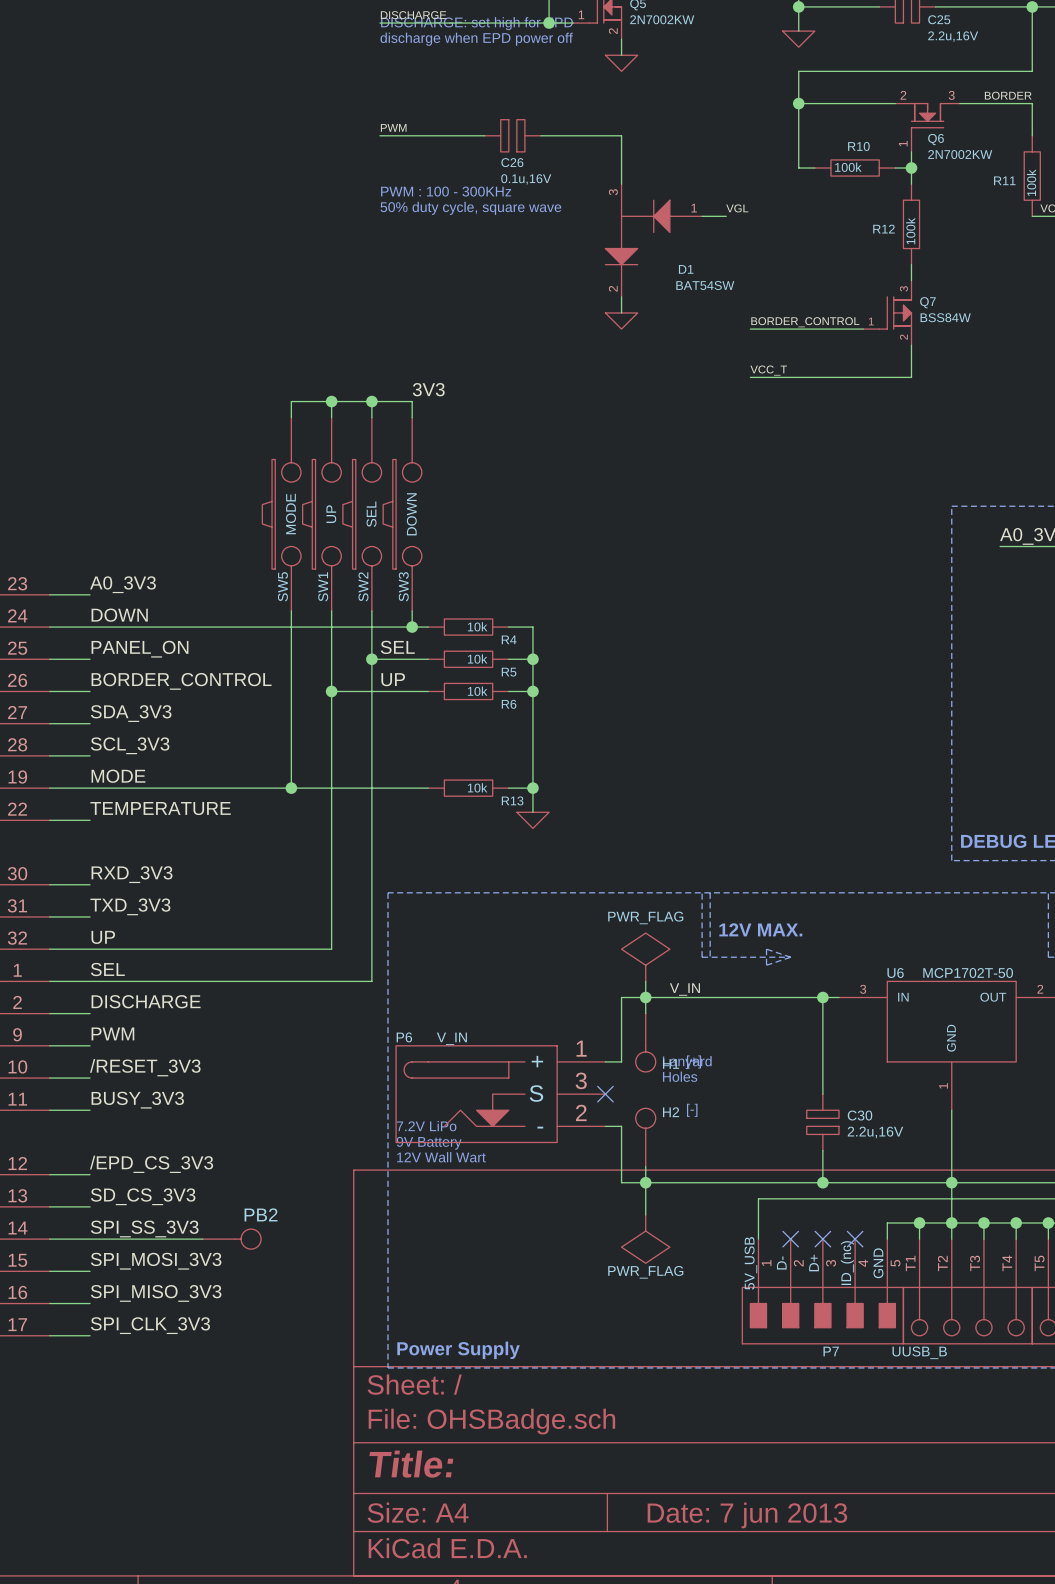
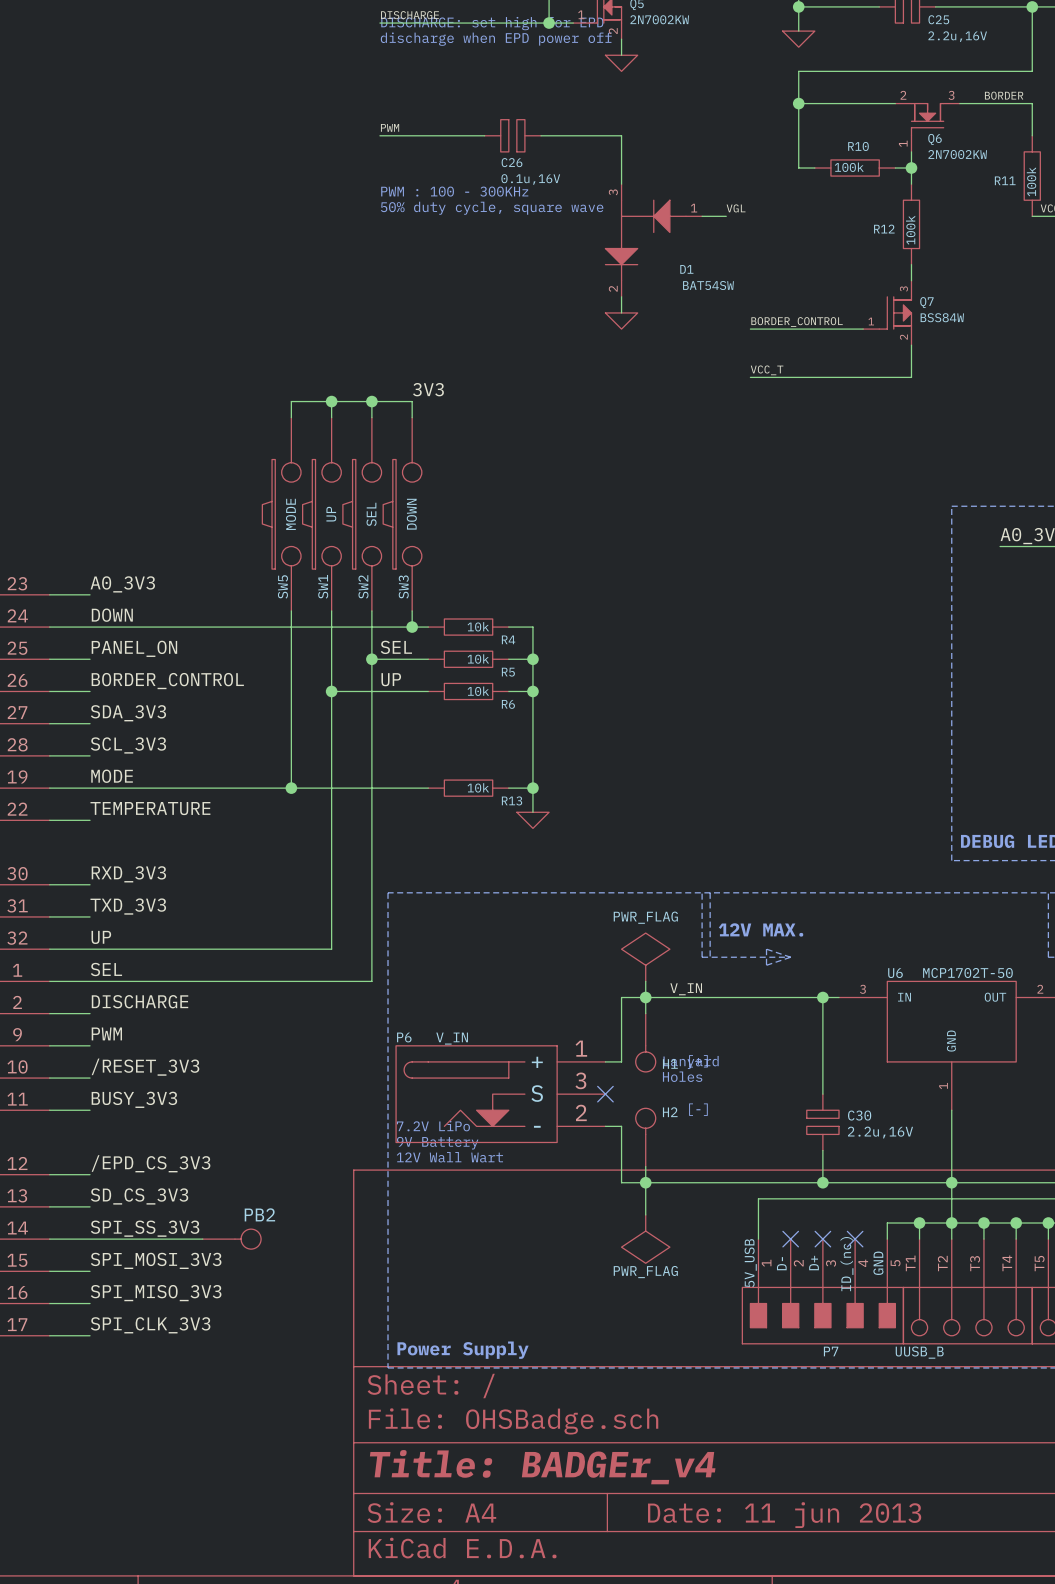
title block: Title: (411, 1464) -> Title: BADGEr_v4 (542, 1467)
title block: Date: 7 jun 2013 (747, 1515) -> Date: 11 jun 2013 (784, 1515)

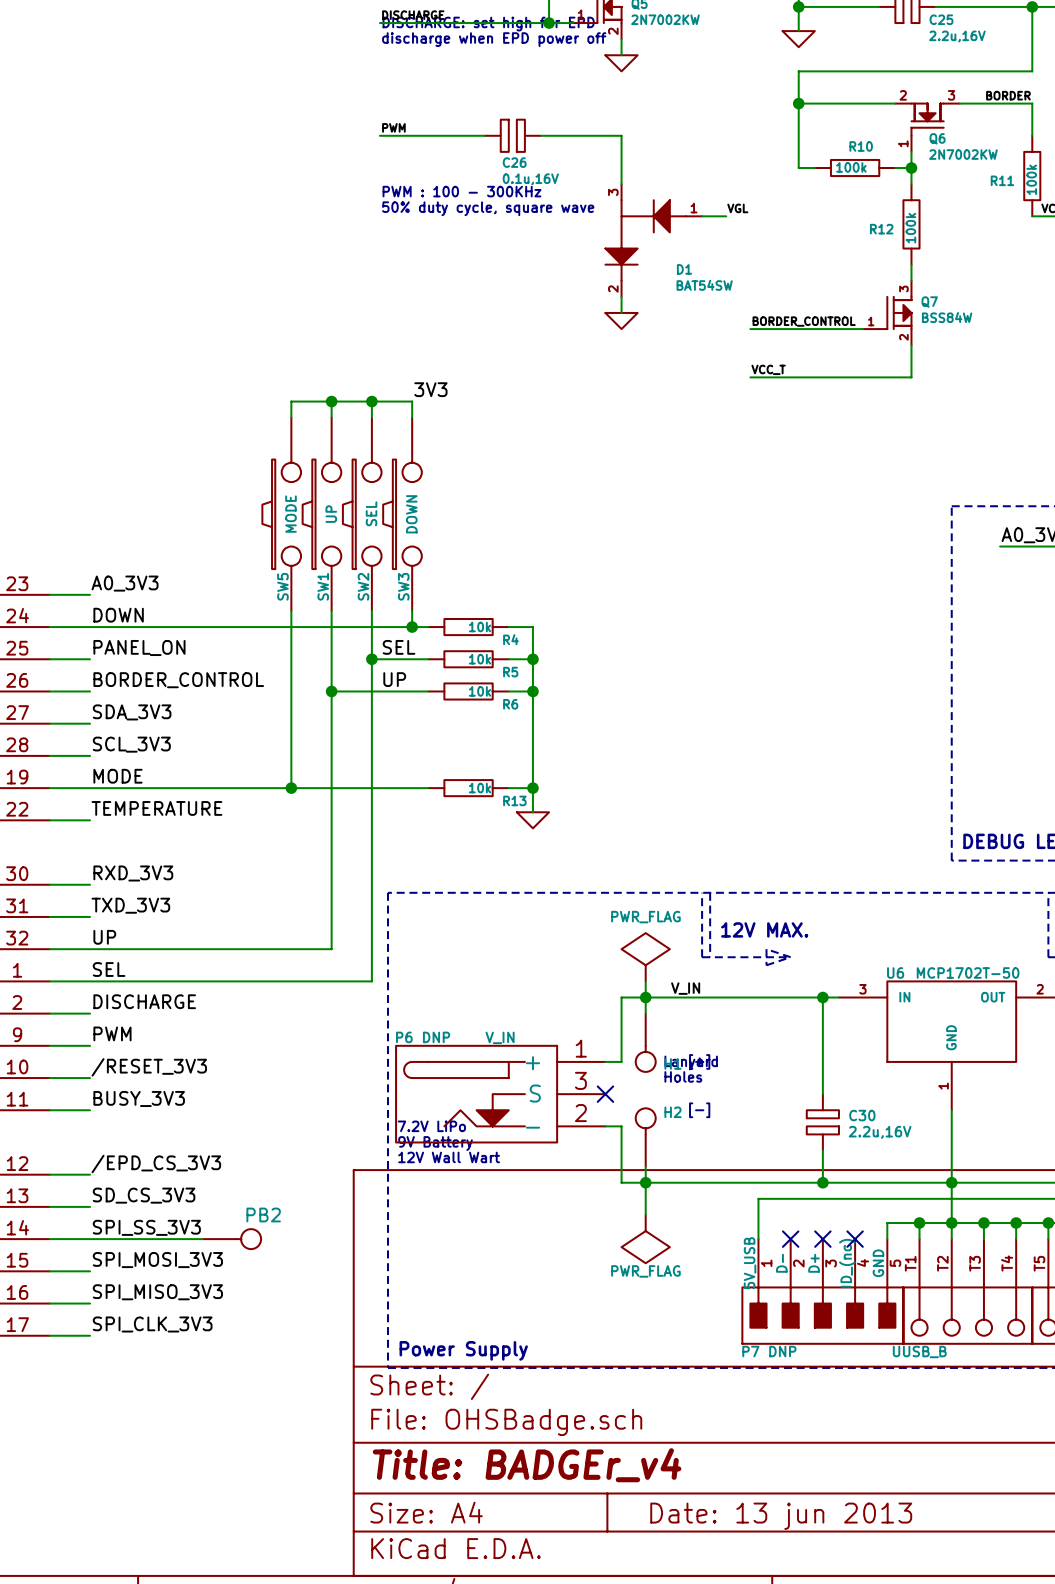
P6 text: none -> DNP (436, 1037)
P6 value position: V_IN (452, 1038) -> V_IN (500, 1037)
P7 text: none -> DNP (782, 1351)
P7 name position: P7 (831, 1351) -> P7 (750, 1351)
title block: Date: 11 jun 2013 (784, 1515) -> Date: 13 jun 2013 (781, 1516)

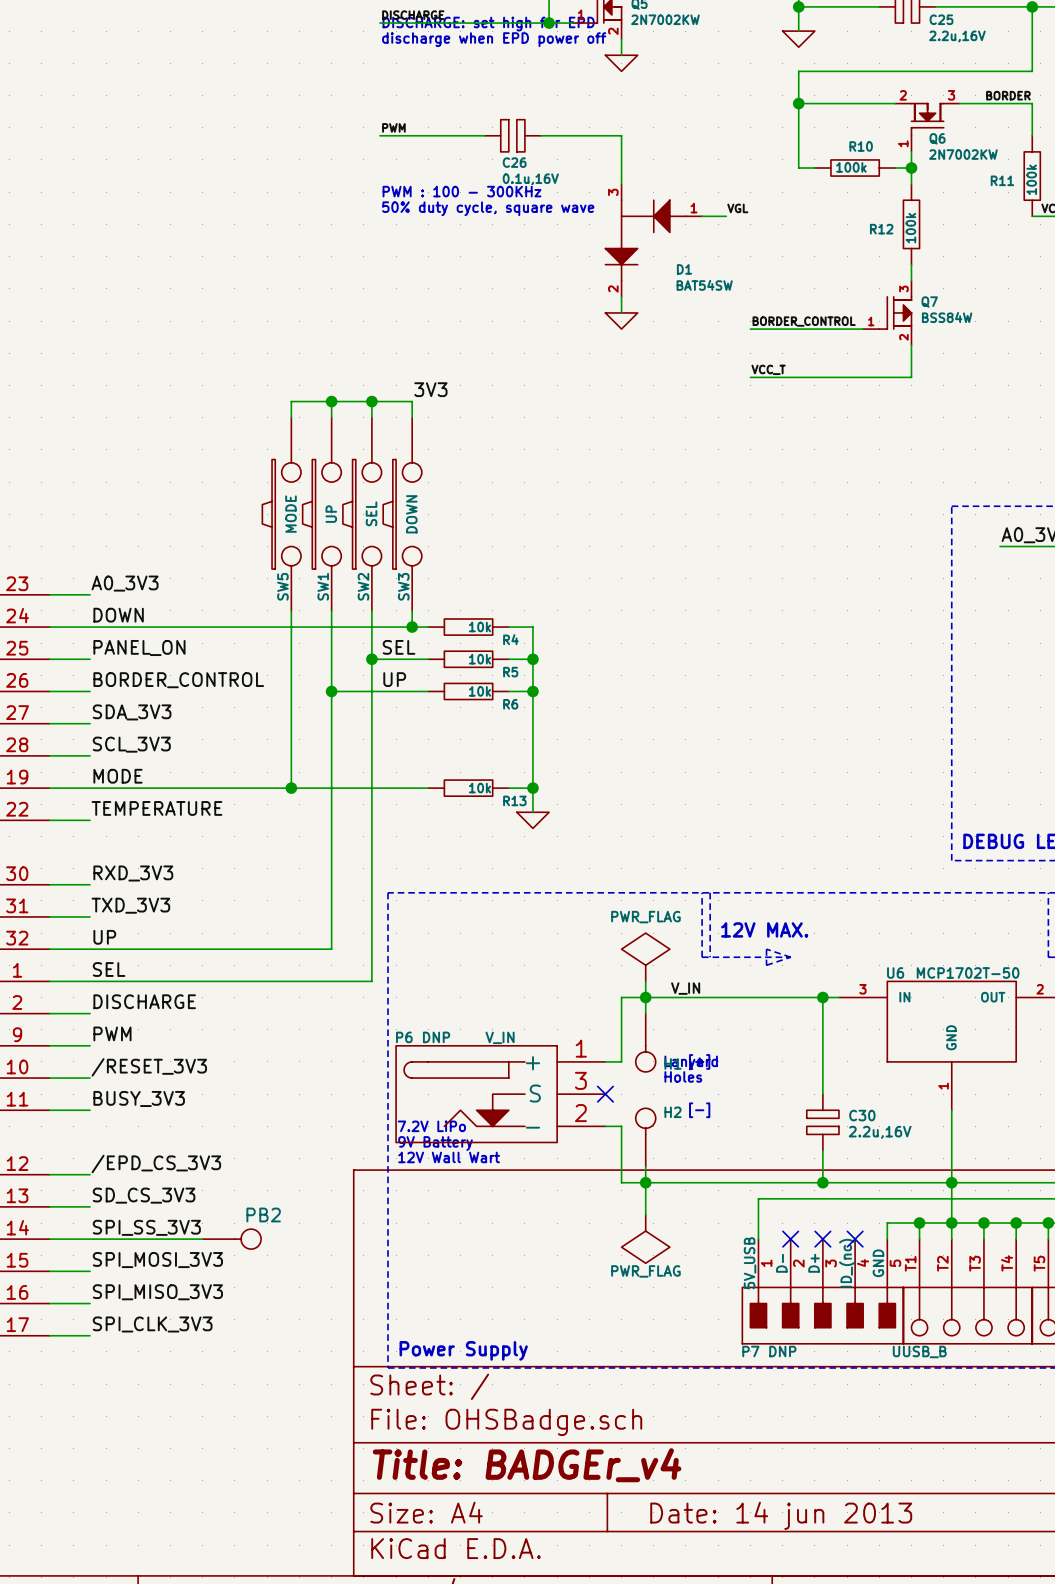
title block: Date: 13 jun 2013 (781, 1516) -> Date: 14 jun 2013 (781, 1515)

